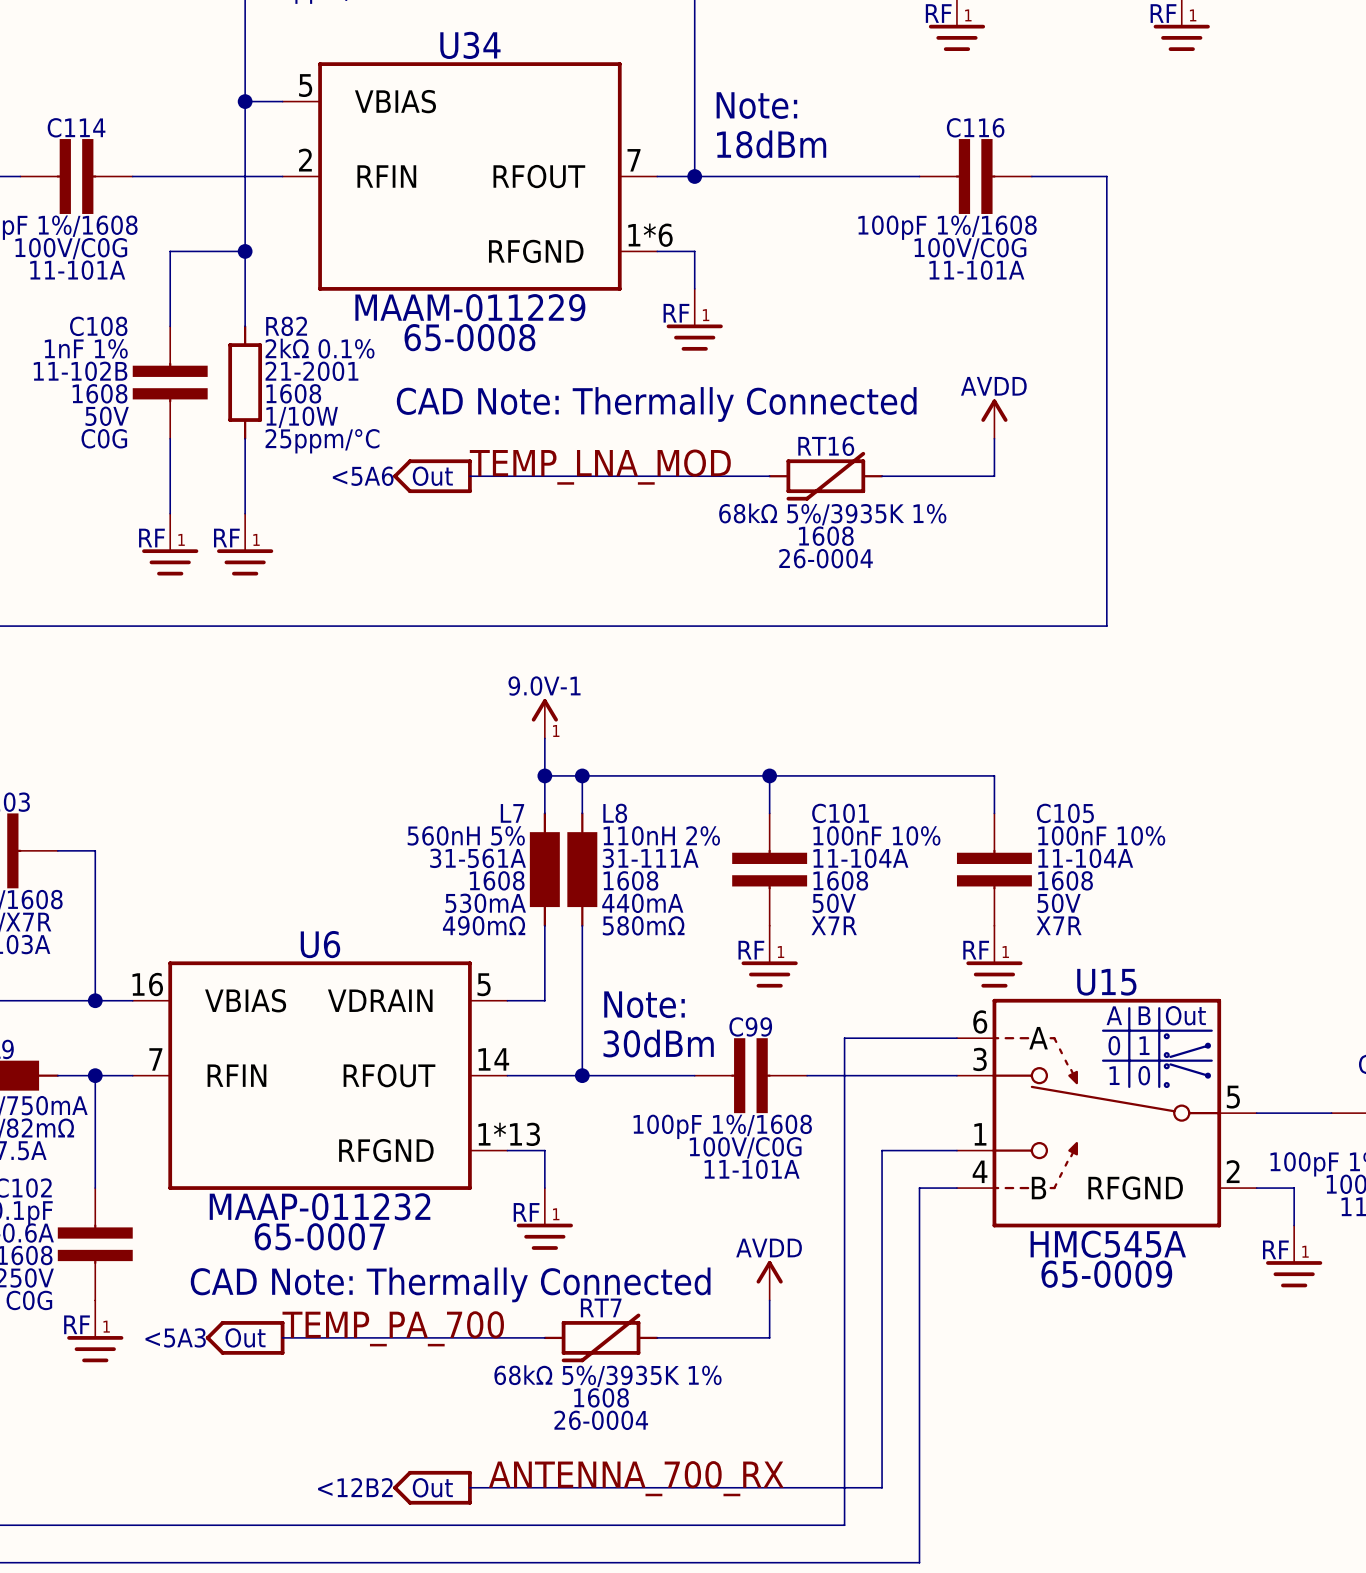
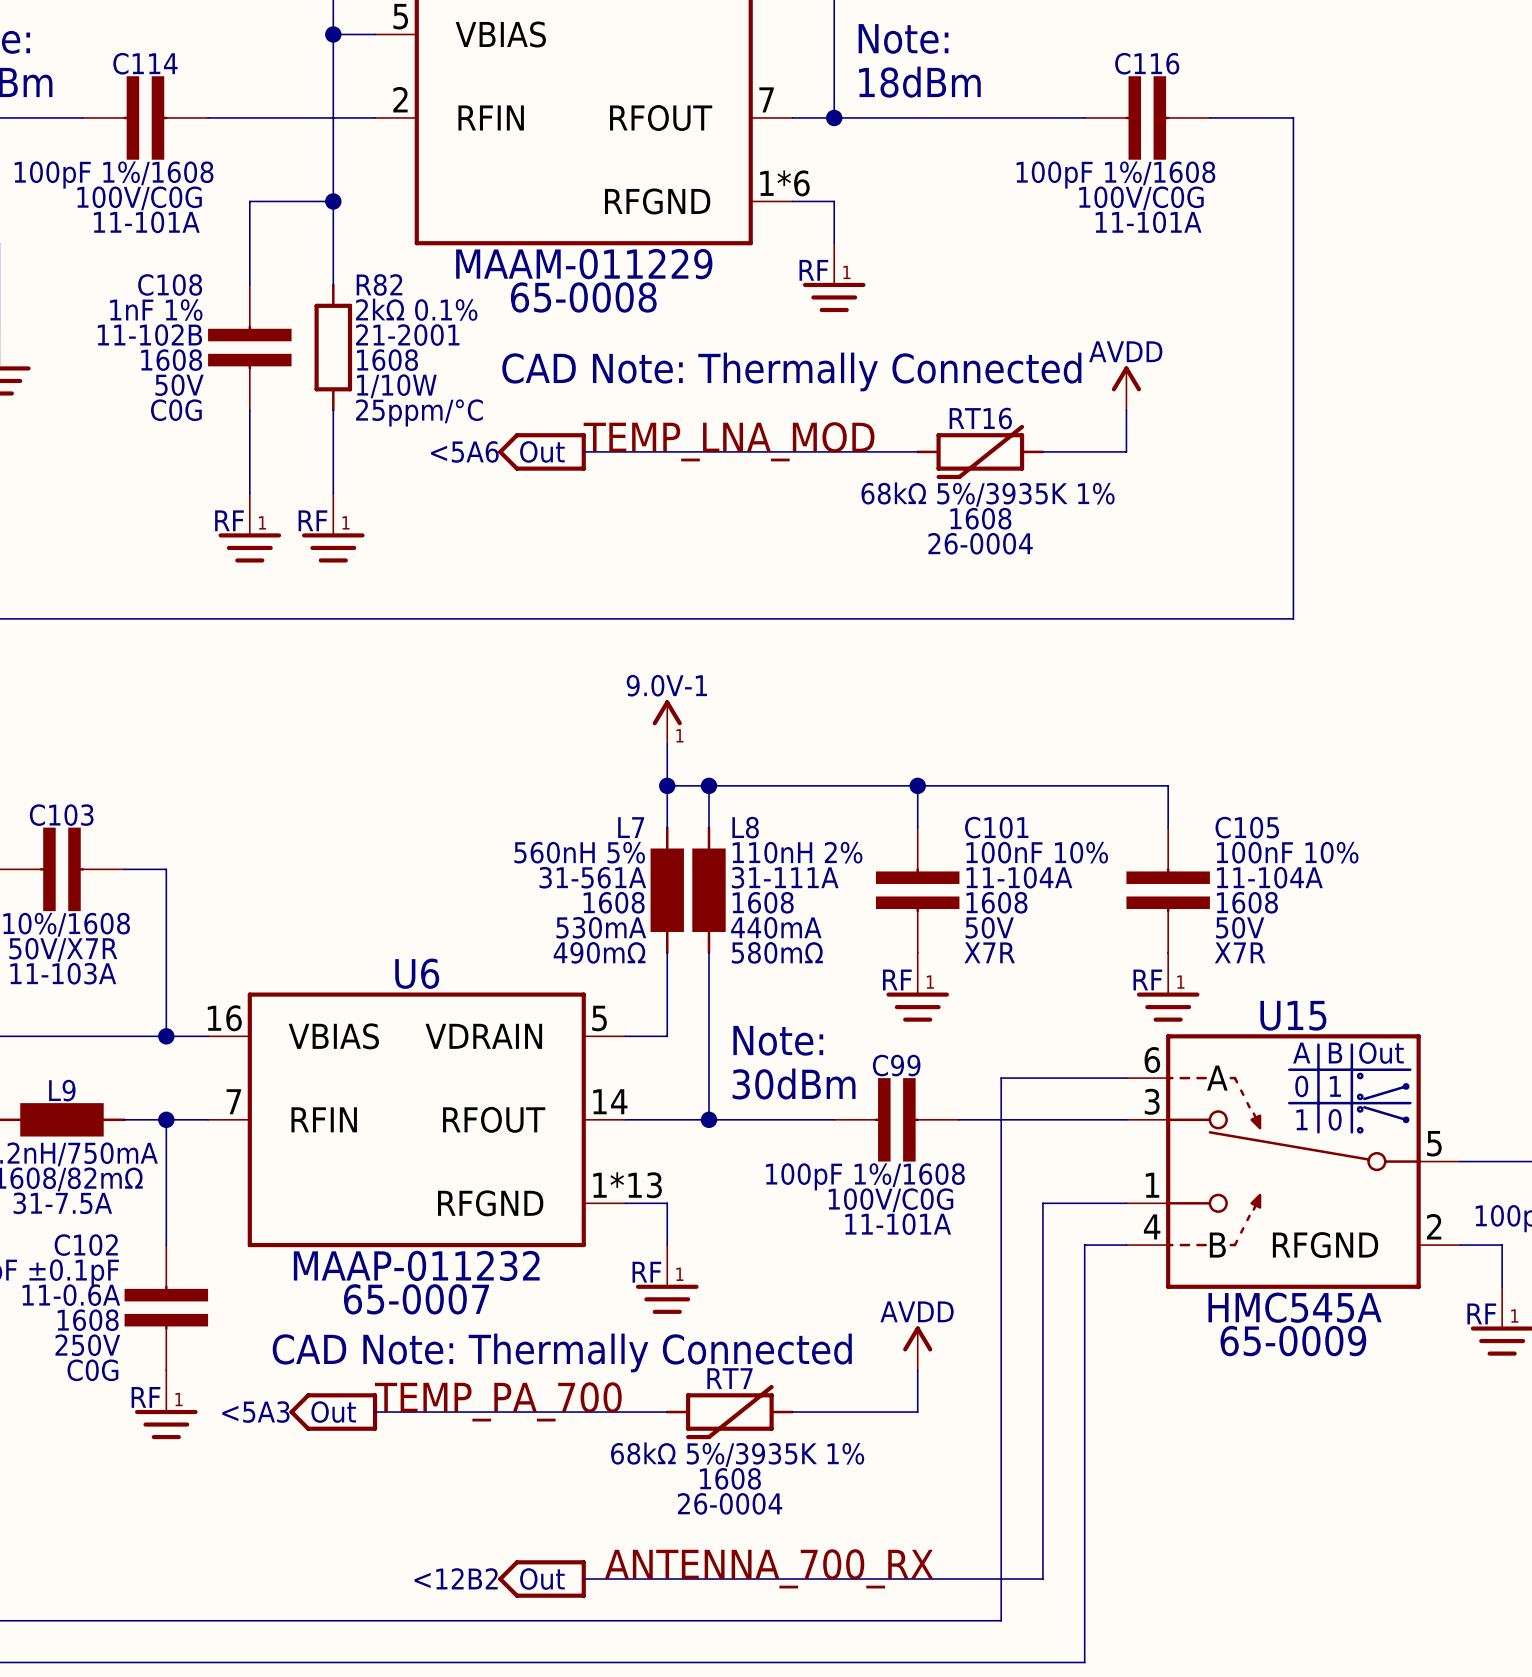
power symbol position: AVDD (994, 419) -> AVDD (1126, 388)
wire: (994, 438) (994, 476) (956, 476) -> (1126, 410) (1126, 451)

